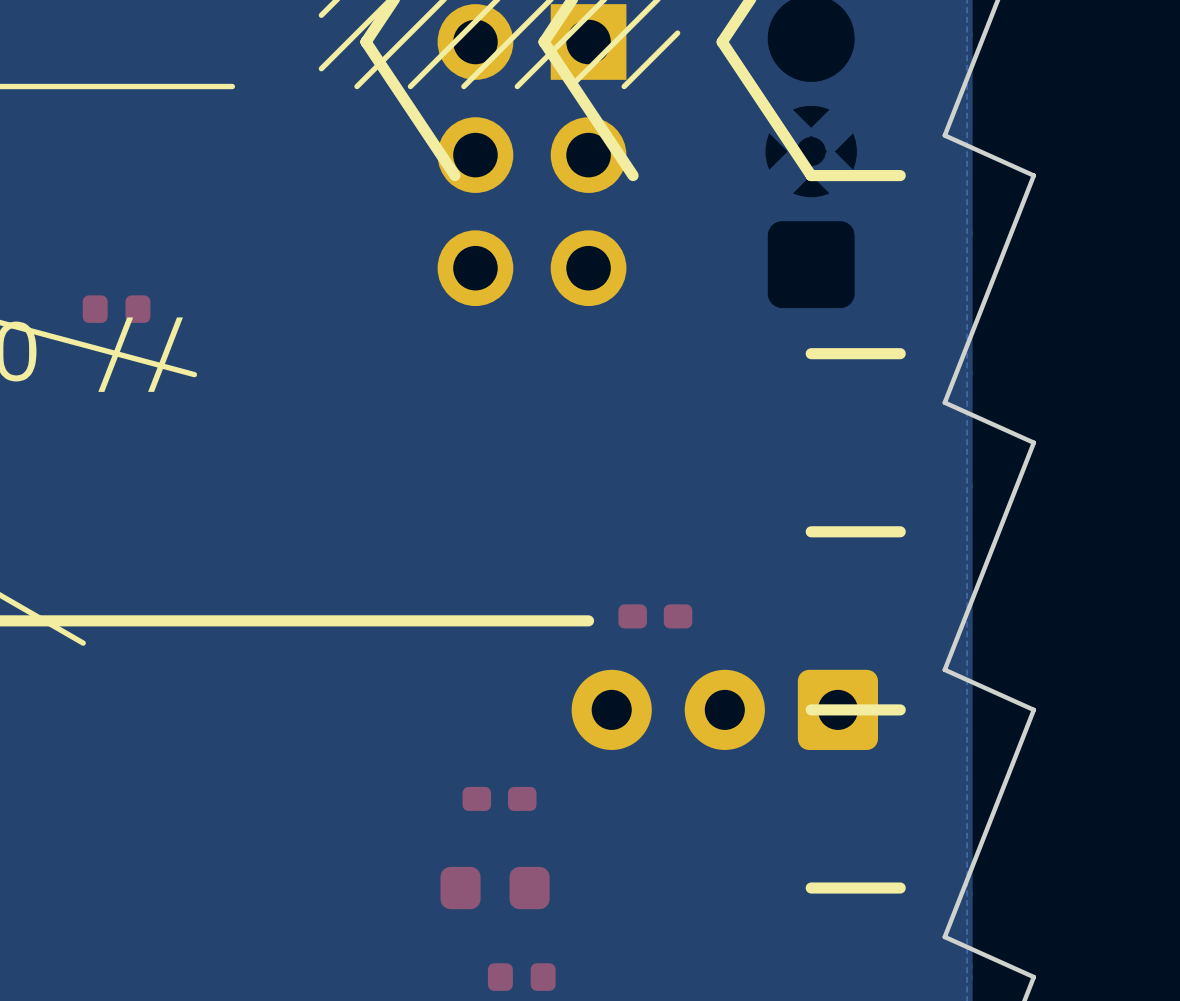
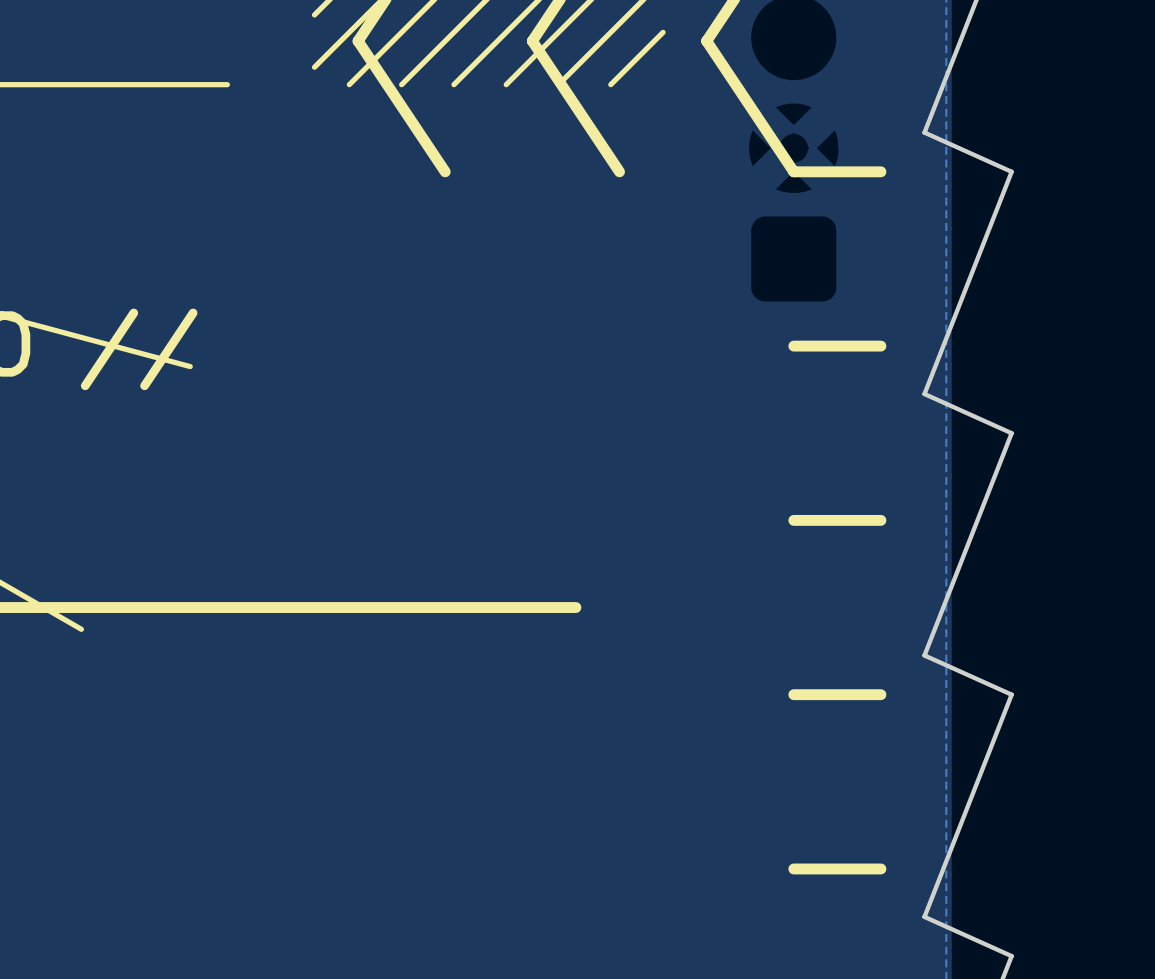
part: (532, 155) -> none
part: (116, 309) -> none
part: (655, 616) -> none
part: (724, 709) -> none
part: (499, 798) -> none
part: (495, 888) -> none
part: (521, 977) -> none

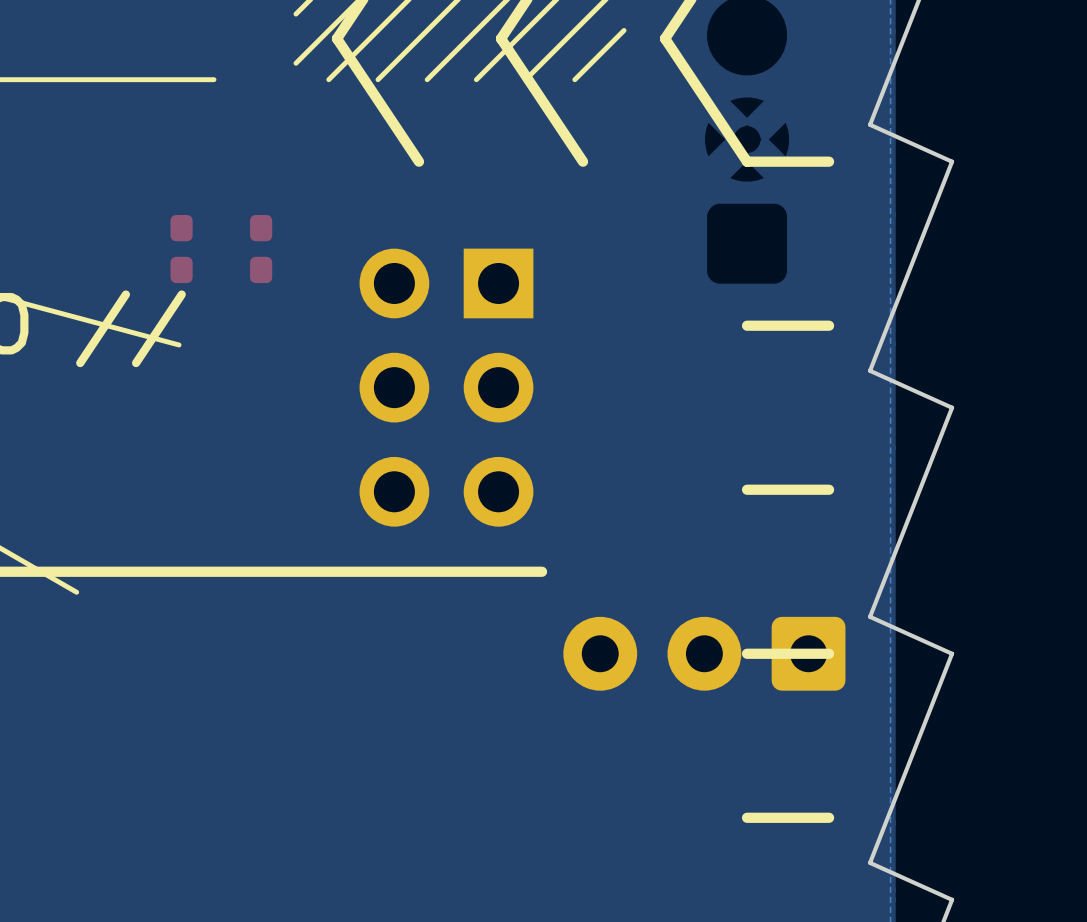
part: none -> (181, 249)
part: none -> (261, 249)
part: none -> (446, 387)
part: none -> (704, 653)

